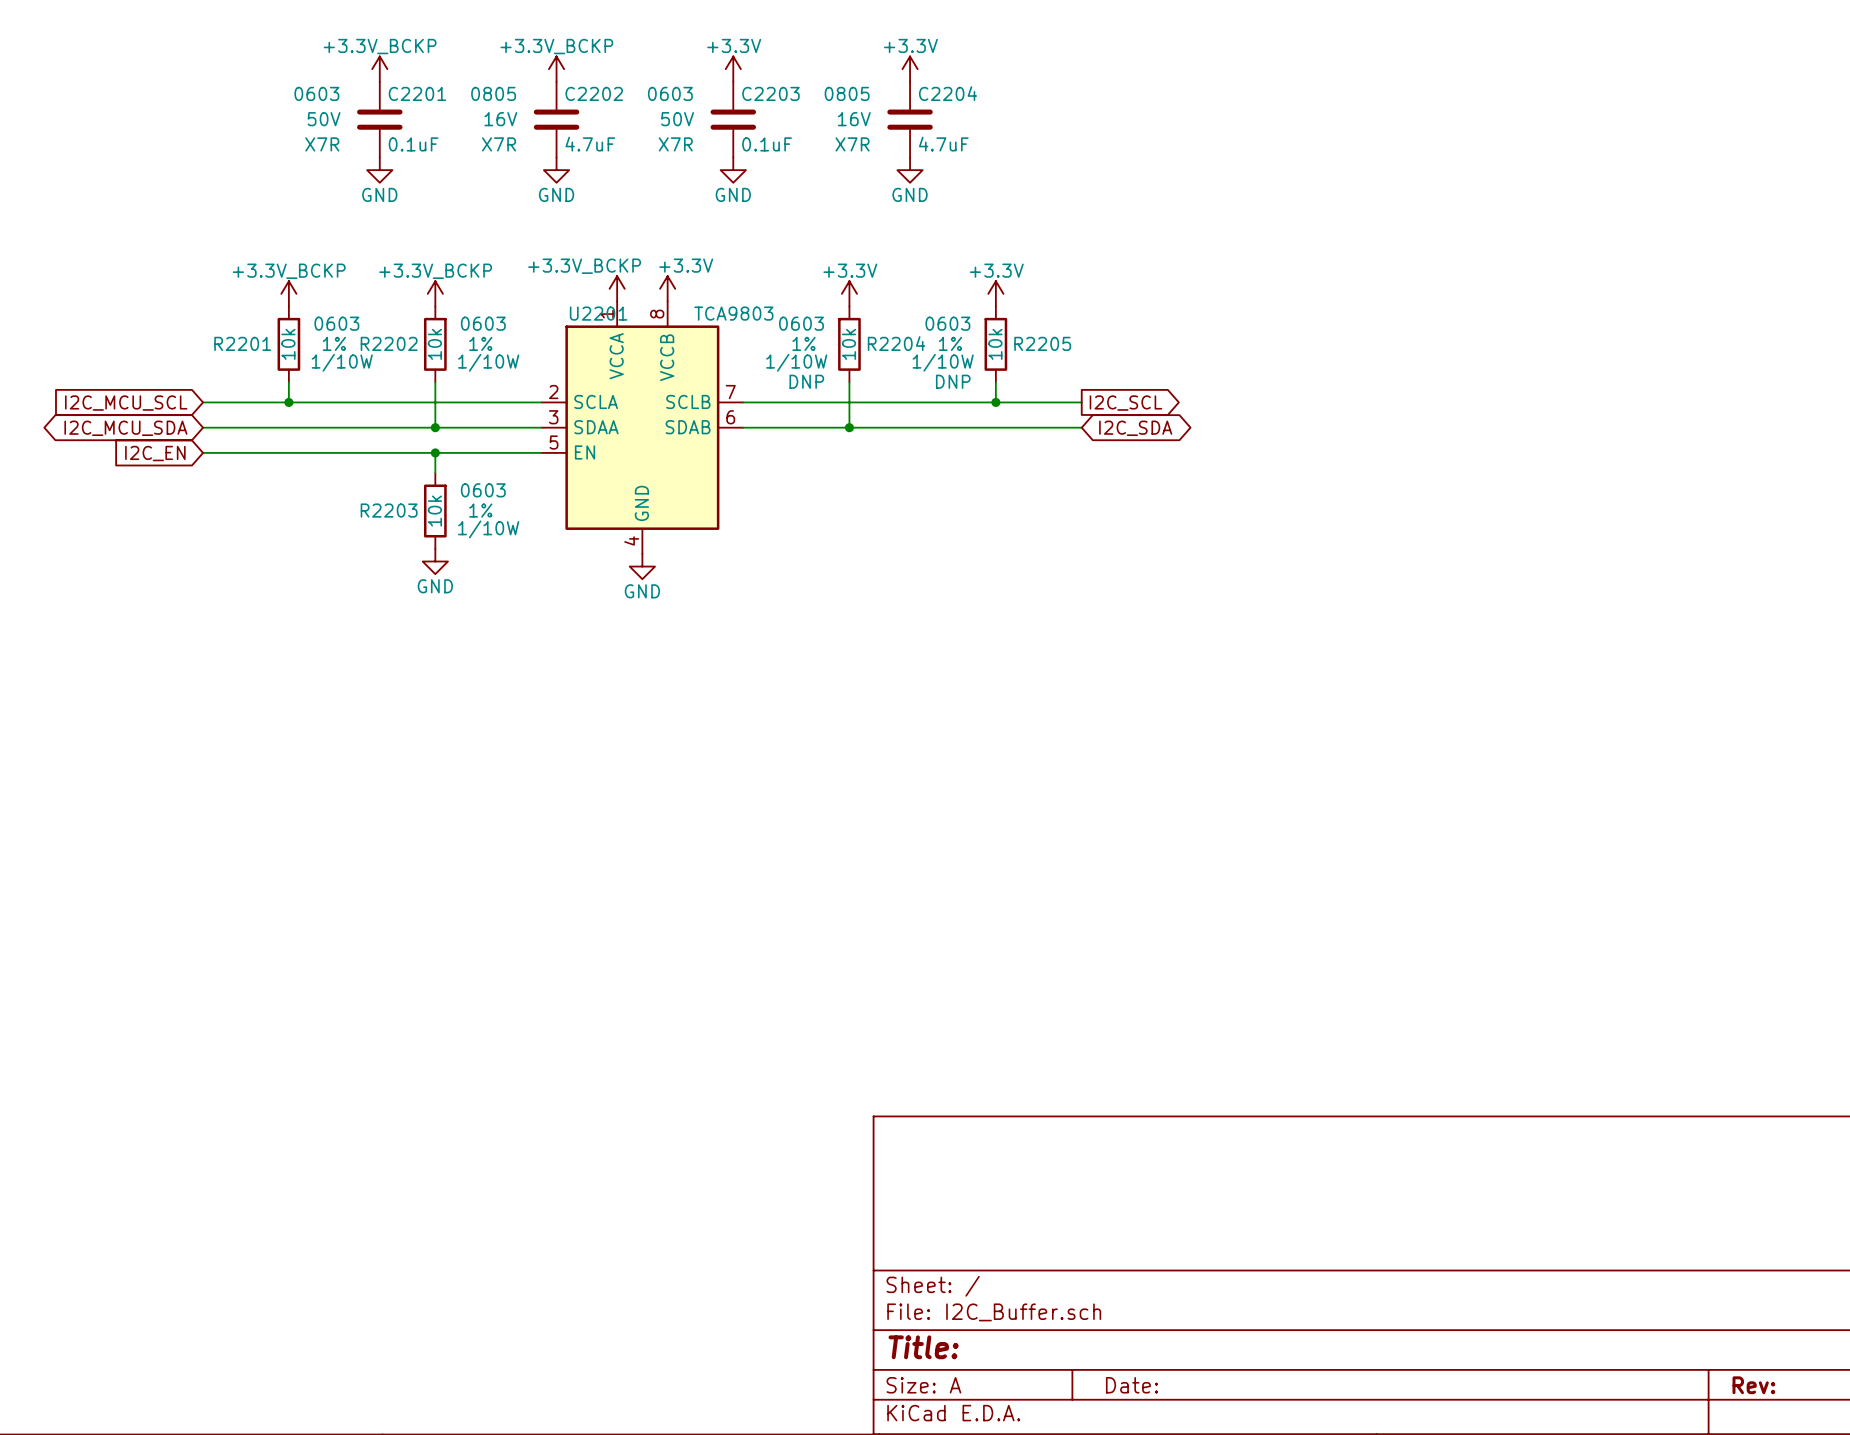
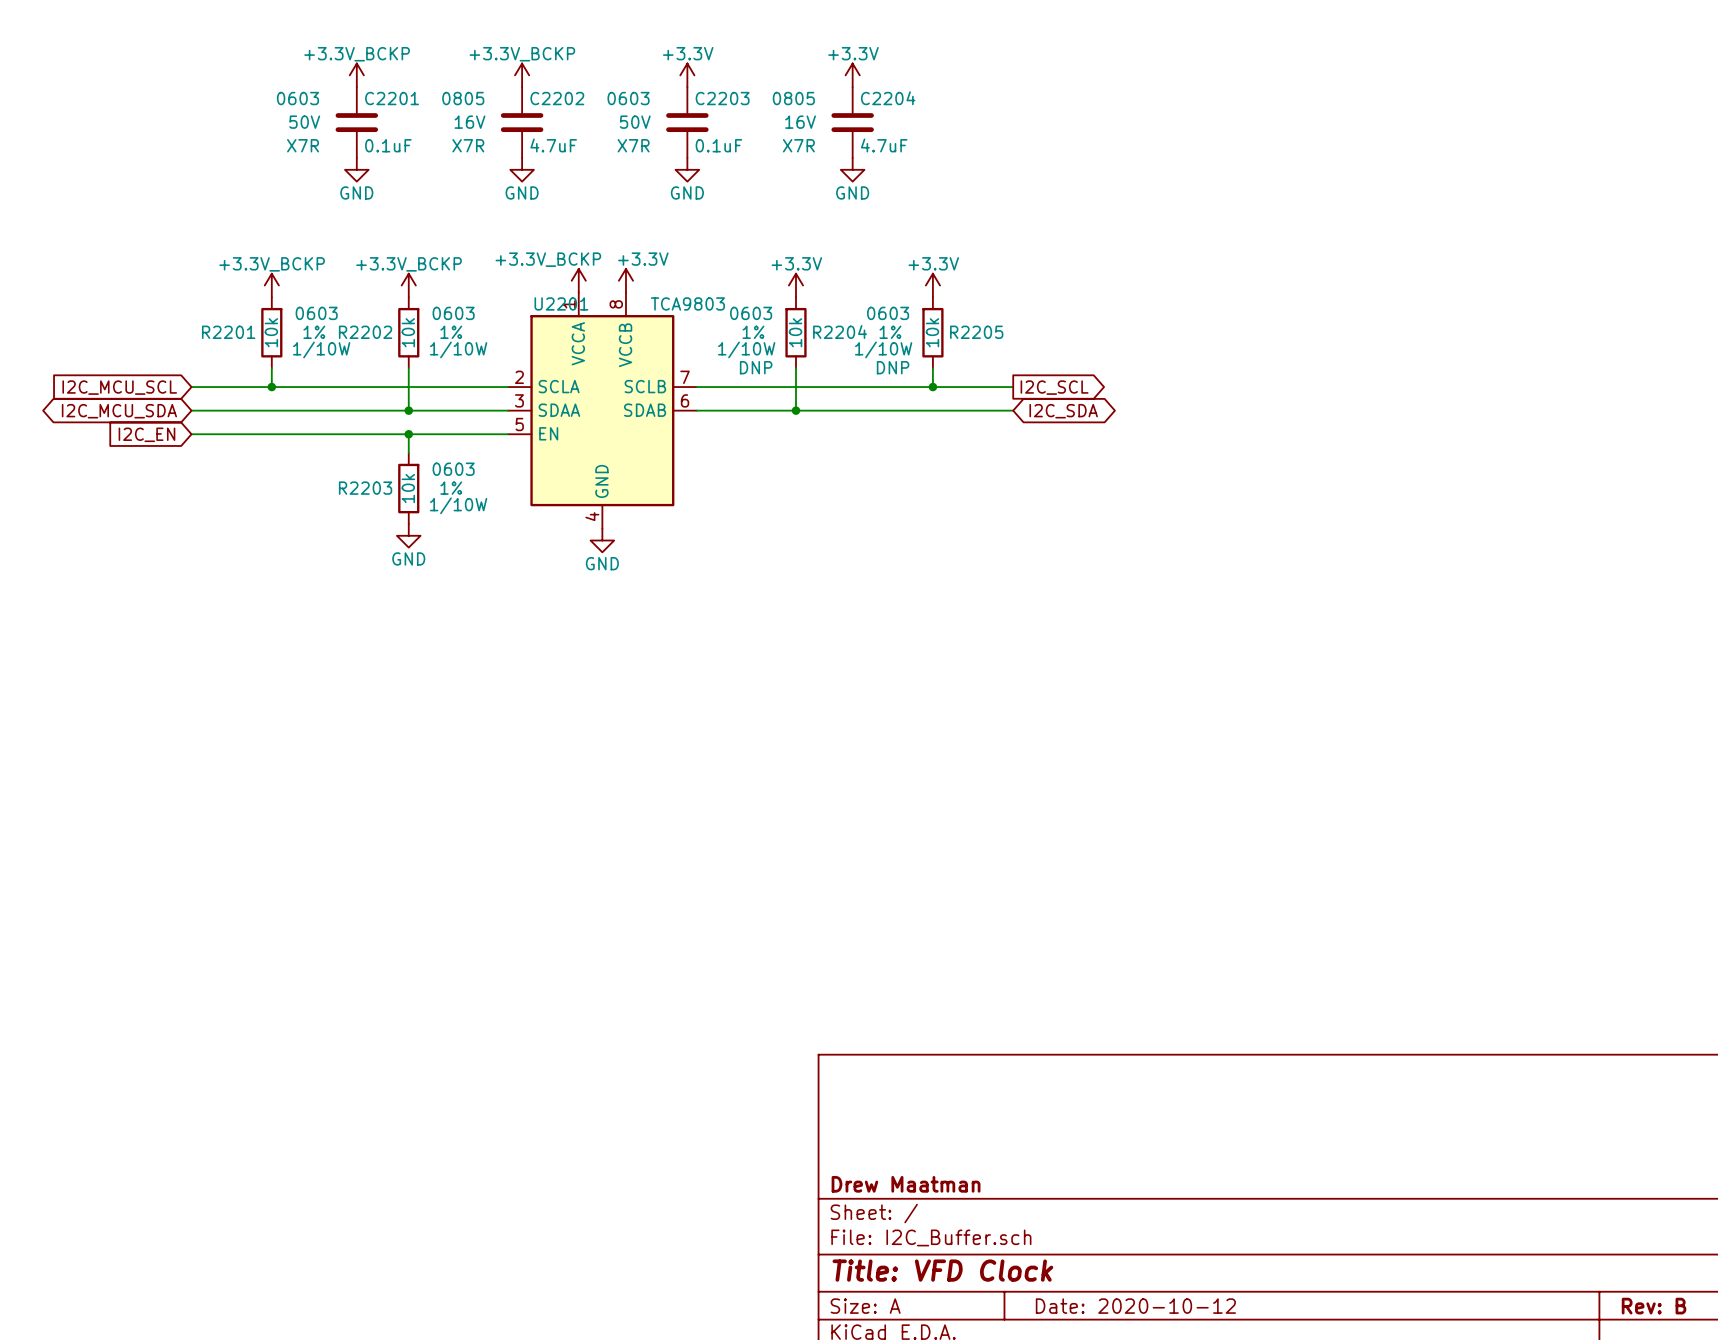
title block: none -> Drew Maatman (906, 1184)
title block: Title: (923, 1347) -> Title: VFD Clock (942, 1270)
title block: Date: (1131, 1385) -> Date: 2020-10-12 (1135, 1306)
title block: Rev: (1753, 1385) -> Rev: B (1654, 1306)

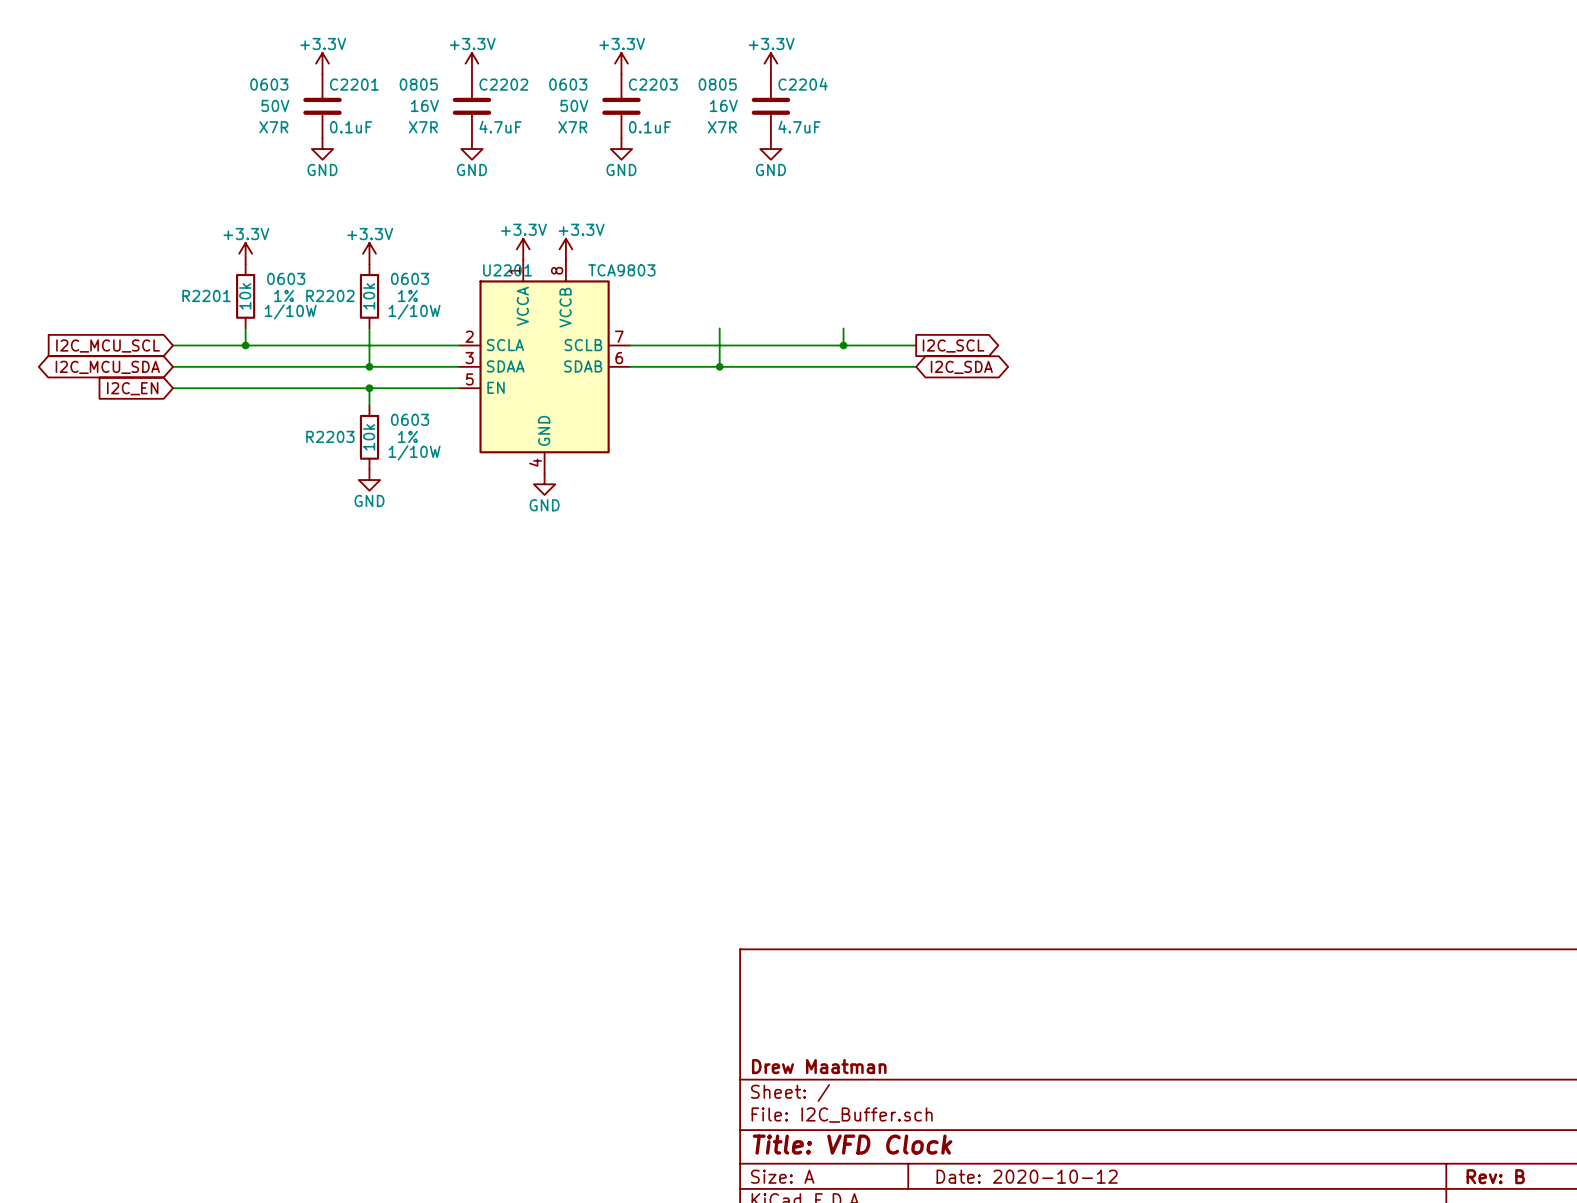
power symbol: +3.3V_BCKP (356, 75) -> +3.3V (322, 63)
power symbol: +3.3V_BCKP (522, 75) -> +3.3V (471, 63)
power symbol: +3.3V_BCKP (578, 280) -> +3.3V (523, 249)
power symbol: +3.3V_BCKP (271, 285) -> +3.3V (245, 253)
power symbol: +3.3V_BCKP (408, 285) -> +3.3V (369, 253)
power symbol: +3.3V (795, 285) -> none
power symbol: +3.3V (932, 285) -> none
R2204: 10k (795, 332) -> none
R2205: 10k (932, 332) -> none

